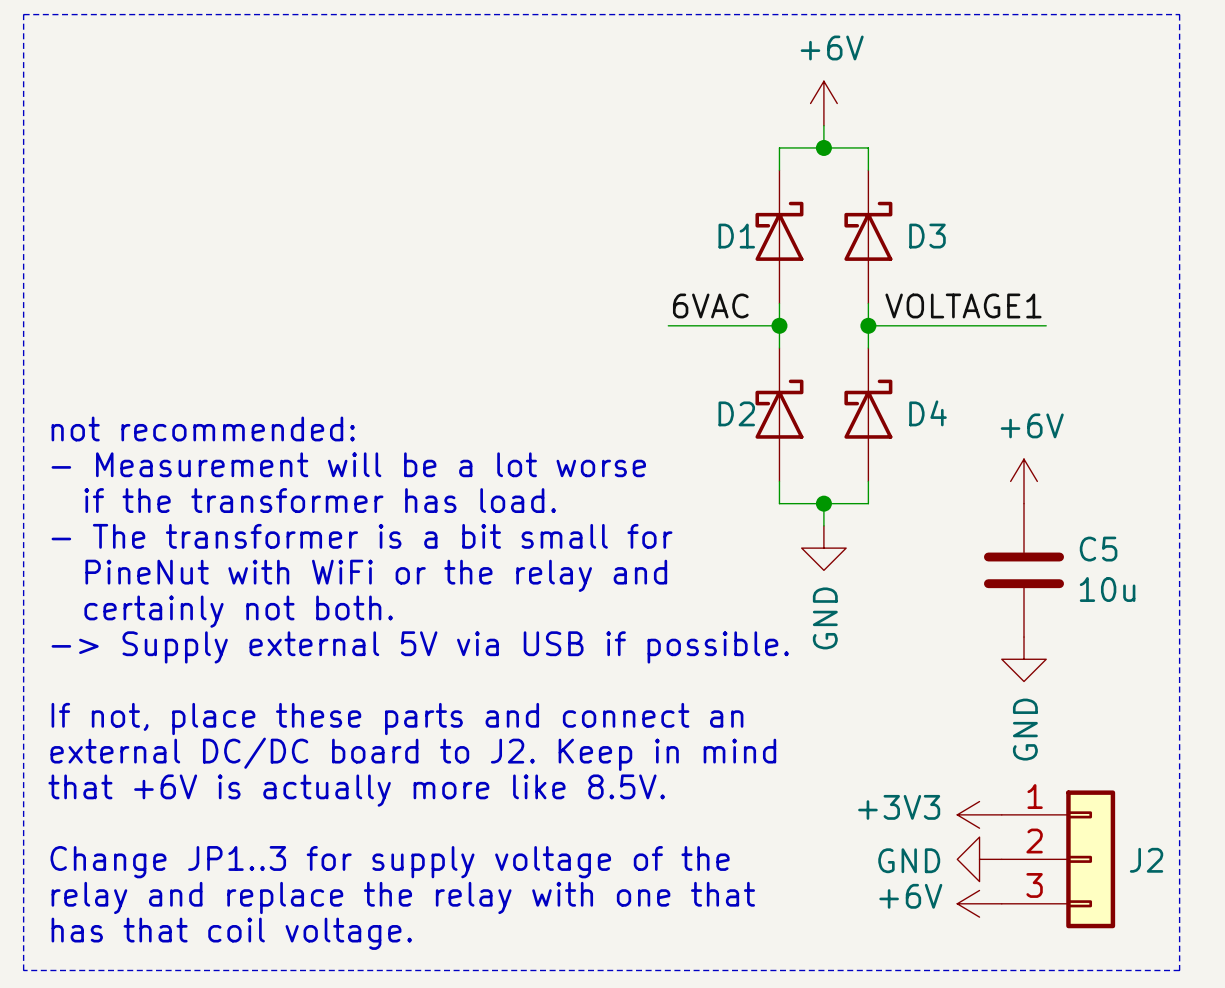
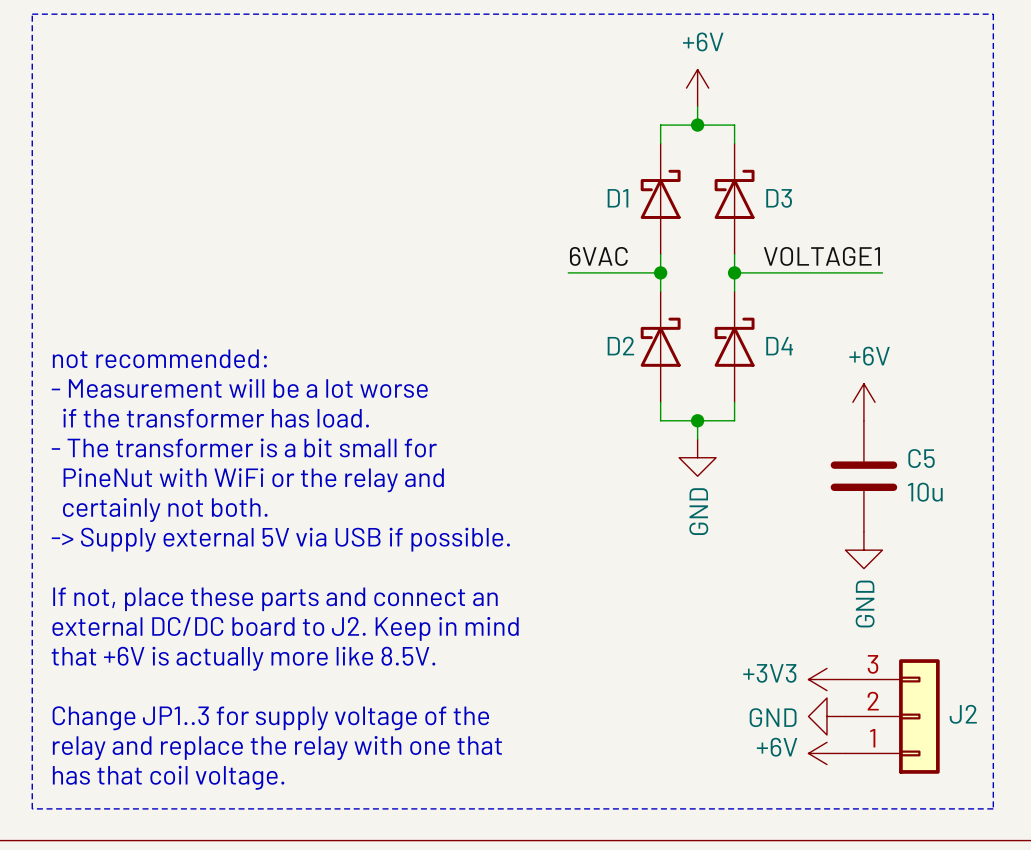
J2 flip: as is (1090, 859) -> up-down (919, 716)

